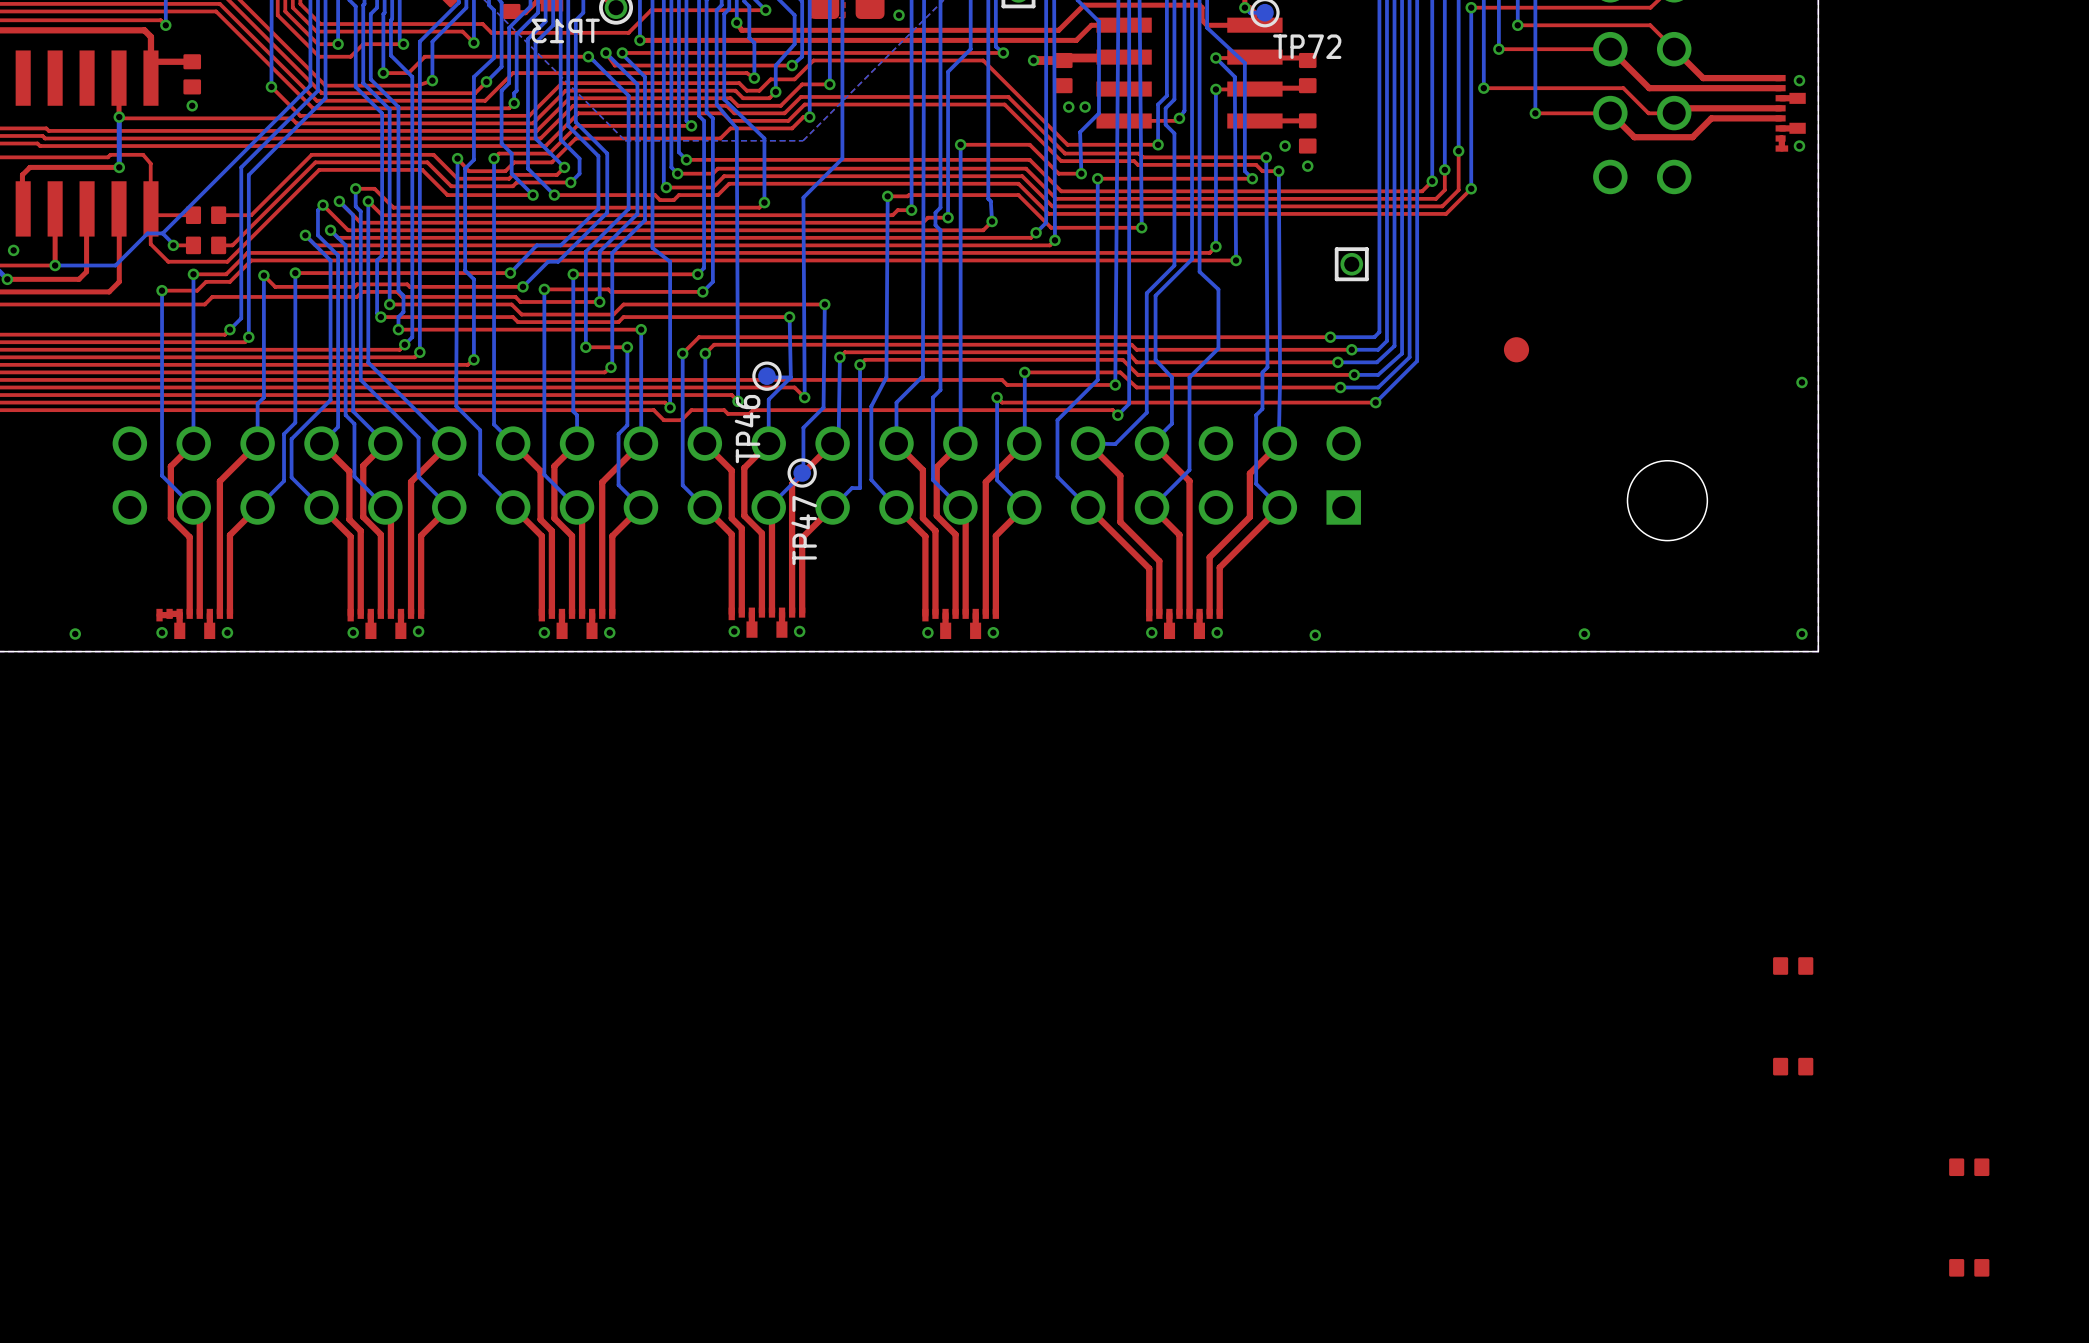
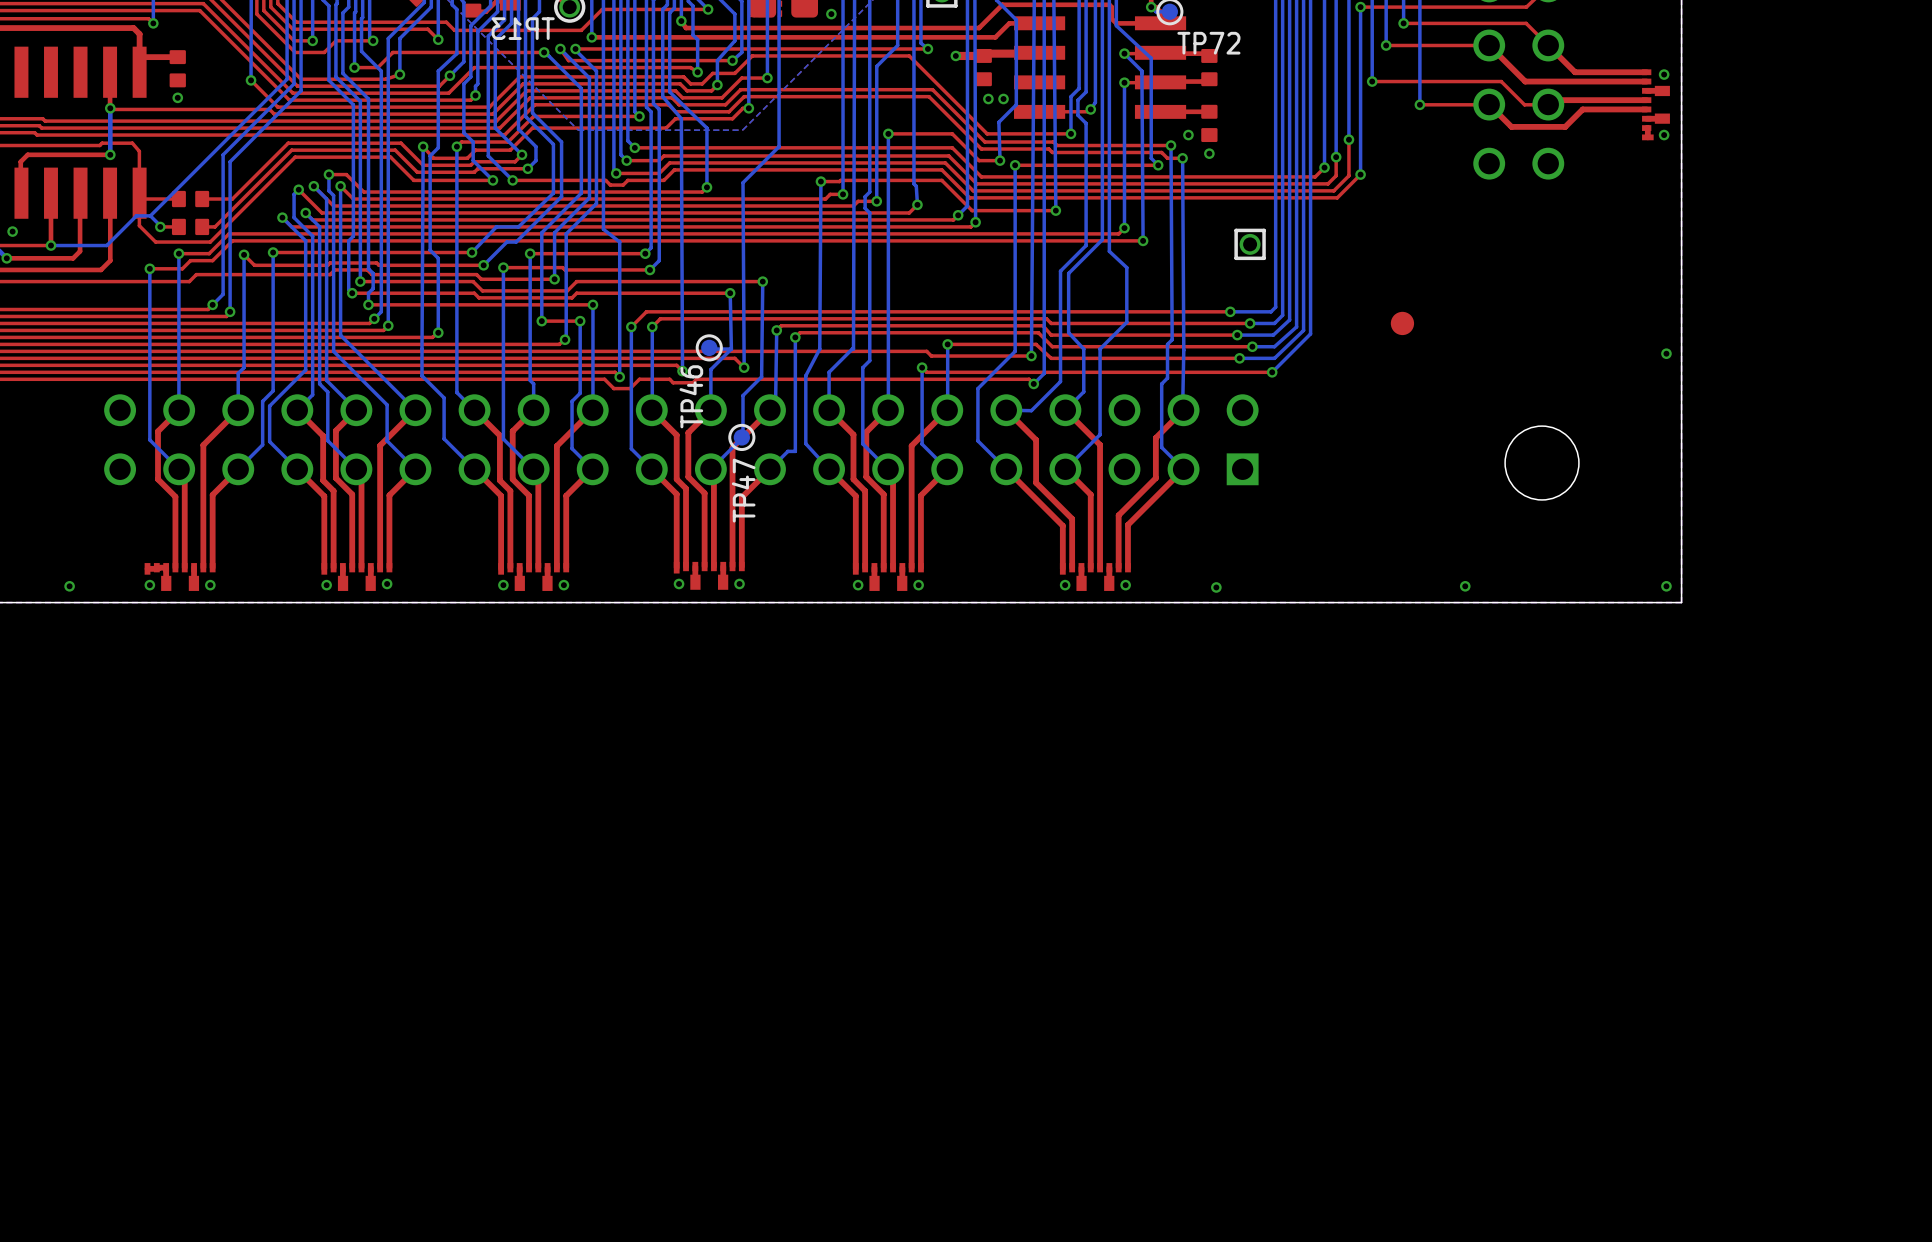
part: (1793, 966) -> none
part: (1793, 1066) -> none
part: (1969, 1167) -> none
part: (1969, 1267) -> none

